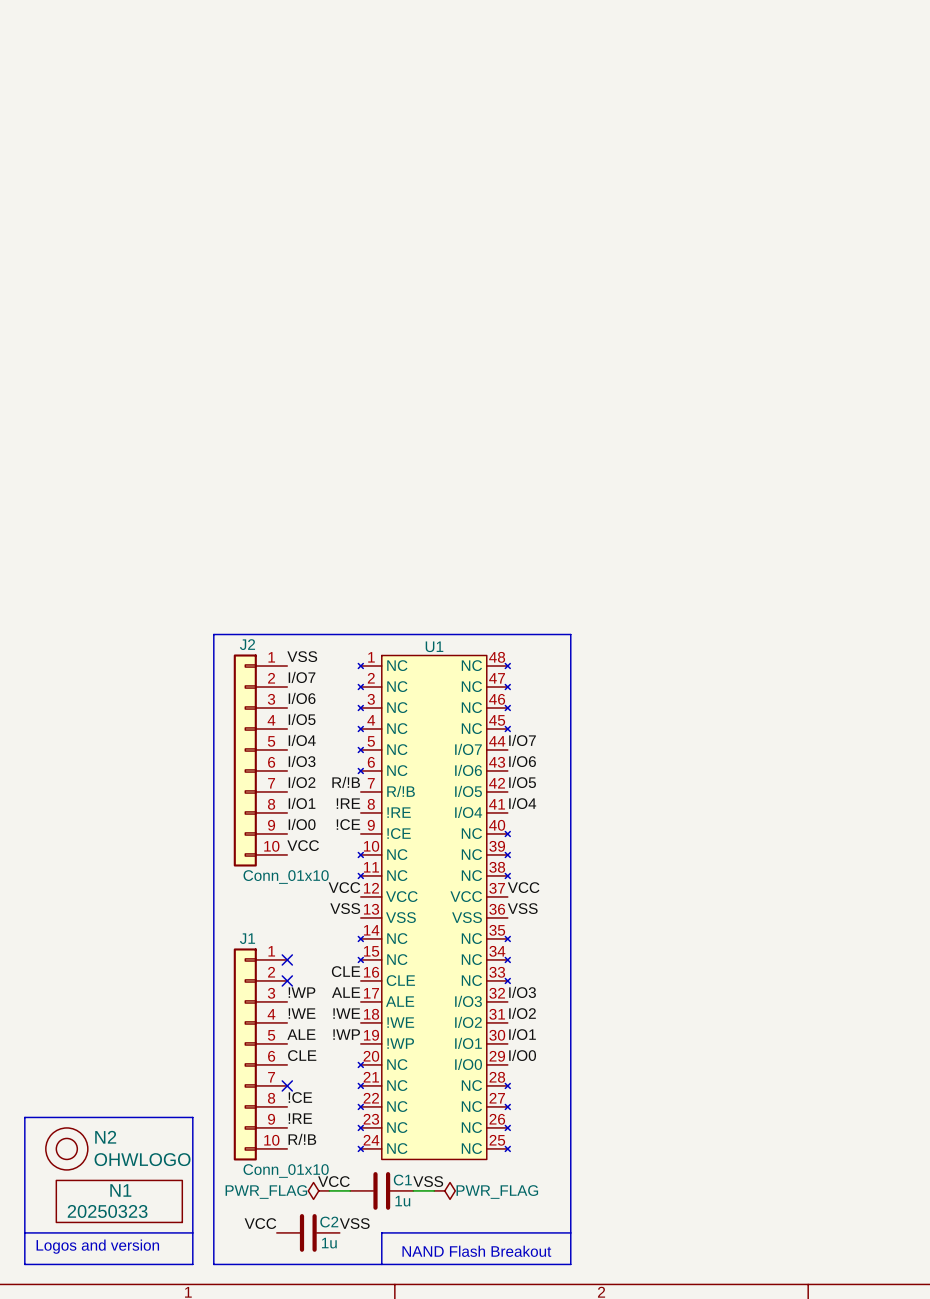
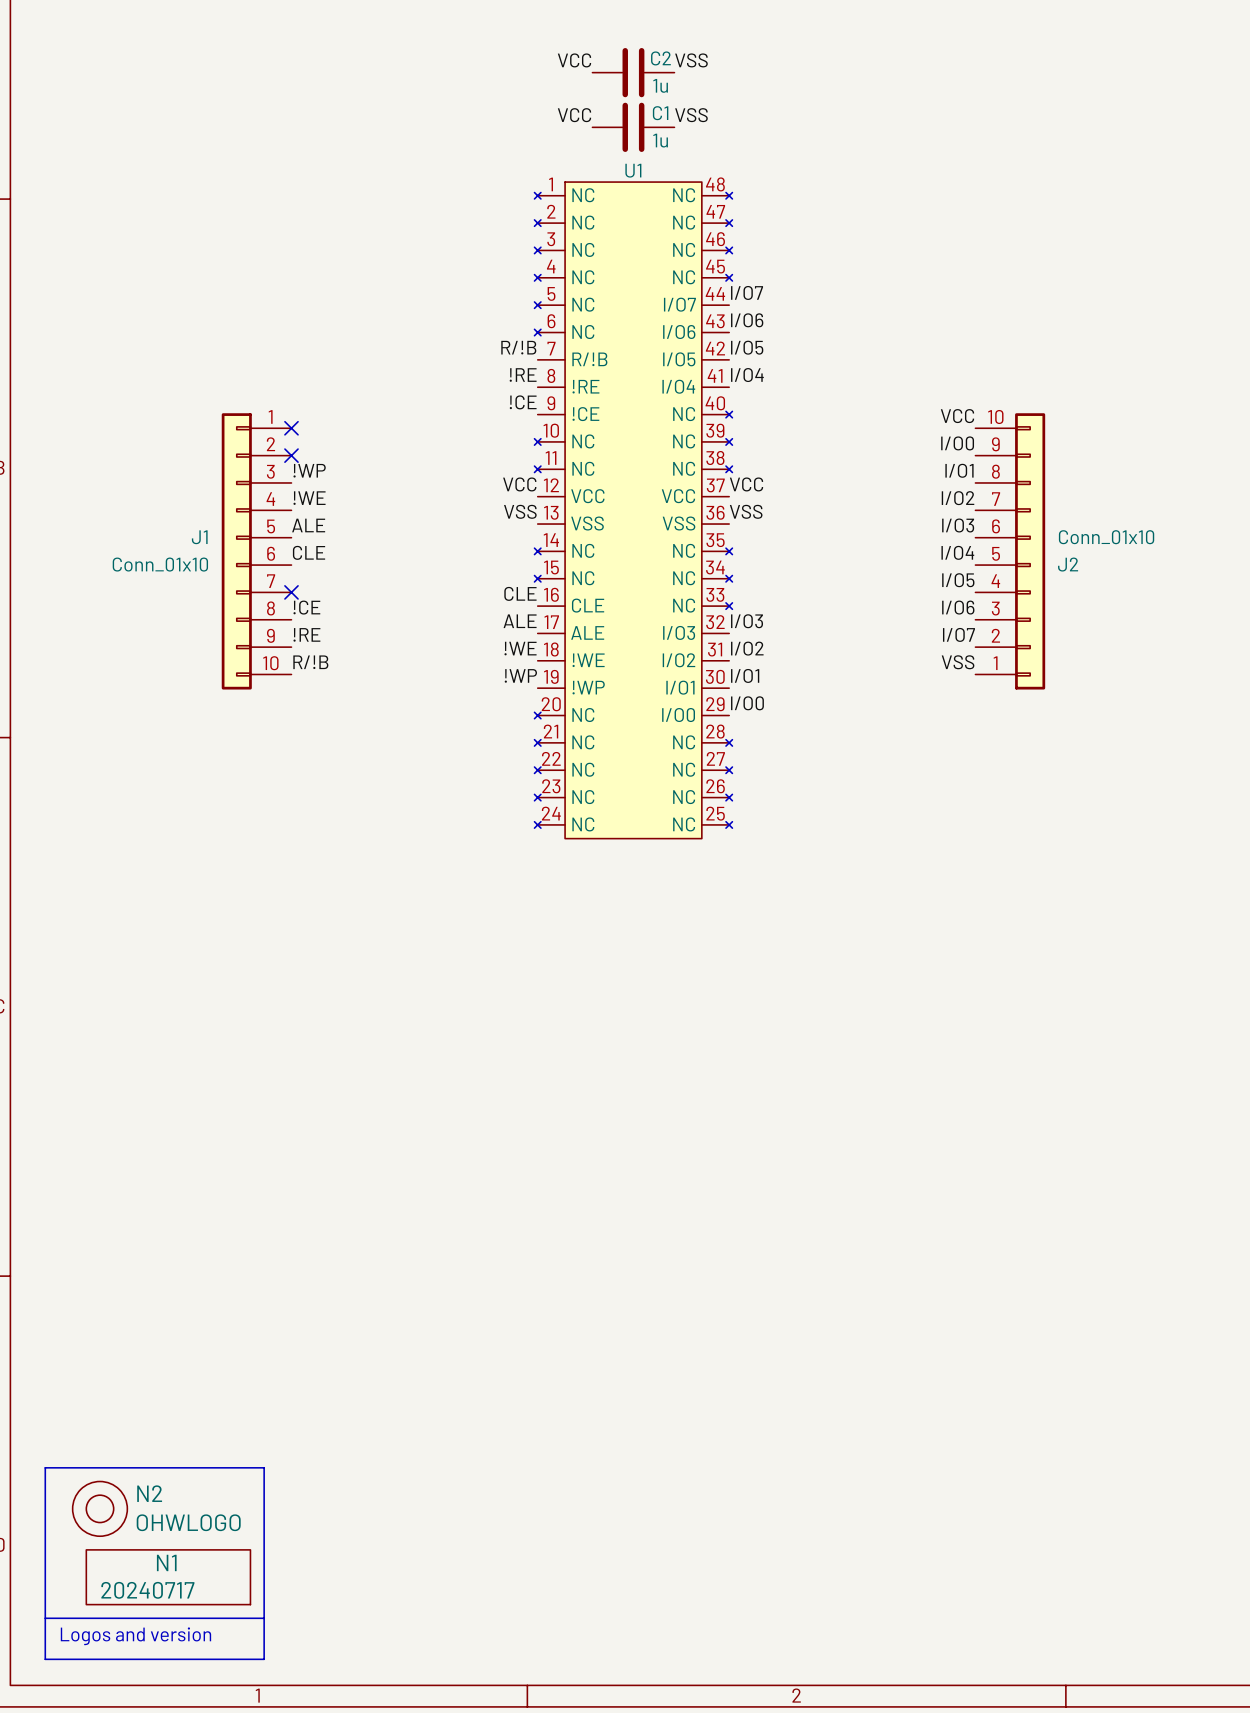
label: none -> VCC (574, 60)
label: none -> VSS (691, 60)
label: none -> VCC (574, 115)
label: none -> VSS (691, 115)
label: none -> I/O7 (747, 292)
label: none -> I/O6 (747, 320)
label: none -> R/!B (518, 347)
label: none -> I/O5 (747, 347)
label: none -> !RE (523, 375)
label: none -> I/O4 (747, 375)
label: none -> !CE (523, 402)
label: none -> VCC (957, 416)
no-connect mark: none -> (291, 428)
label: none -> I/O0 (957, 443)
no-connect mark: none -> (291, 455)
label: none -> I/O1 (959, 470)
label: none -> !WP (309, 470)
label: none -> VCC (519, 484)
label: none -> VCC (746, 484)
label: none -> I/O2 (958, 498)
label: none -> !WE (309, 498)
label: none -> VSS (520, 511)
label: none -> VSS (746, 511)
label: none -> I/O3 (958, 525)
label: none -> ALE (308, 525)
label: none -> I/O4 (957, 552)
label: none -> CLE (309, 552)
label: none -> I/O5 (958, 580)
no-connect mark: none -> (291, 592)
label: none -> CLE (520, 593)
label: none -> I/O6 (958, 607)
label: none -> !CE (306, 607)
label: none -> ALE (520, 621)
label: none -> I/O3 (747, 621)
label: none -> I/O7 (958, 634)
label: none -> !RE (306, 634)
label: none -> !WE (520, 648)
label: none -> I/O2 (747, 648)
label: none -> R/!B (310, 662)
label: none -> VSS (958, 662)
label: none -> !WP (520, 675)
label: none -> I/O1 (745, 675)
label: none -> I/O0 (747, 703)
line: (213, 634) (213, 1264) (570, 1264) (570, 634) (213, 634) -> none
J2 name position: J2 (247, 644) -> J2 (1068, 564)
label: VSS (302, 656) -> none
label: I/O7 (302, 677) -> none
label: I/O6 (302, 698) -> none
label: I/O5 (302, 719) -> none
label: I/O4 (302, 740) -> none
label: I/O7 (522, 740) -> none
J2 rotation: 0° (245, 760) -> 180° (1030, 551)
J2 position: (260, 760) -> (1010, 551)
label: I/O3 (302, 761) -> none
label: I/O6 (522, 761) -> none
label: I/O2 (302, 782) -> none
label: R/!B (346, 782) -> none
label: I/O5 (522, 782) -> none
label: I/O1 (302, 803) -> none
label: !RE (348, 803) -> none
label: I/O4 (522, 803) -> none
label: I/O0 (302, 824) -> none
label: !CE (348, 824) -> none
label: VCC (303, 845) -> none
J2 value position: Conn_01x10 (286, 877) -> Conn_01x10 (1106, 537)
label: VCC (344, 887) -> none
label: VCC (523, 887) -> none
U1 position: (434, 907) -> (633, 510)
label: VSS (345, 908) -> none
label: VSS (522, 908) -> none
J1 name position: J1 (247, 938) -> J1 (199, 537)
no-connect mark: (287, 959) -> none
label: CLE (346, 971) -> none
no-connect mark: (287, 980) -> none
label: !WP (301, 992) -> none
label: ALE (346, 992) -> none
label: I/O3 (522, 992) -> none
label: !WE (302, 1013) -> none
label: !WE (346, 1013) -> none
label: I/O2 (522, 1013) -> none
label: ALE (301, 1034) -> none
label: !WP (346, 1034) -> none
label: I/O1 (522, 1034) -> none
J1 position: (260, 1054) -> (256, 551)
label: CLE (302, 1055) -> none
label: I/O0 (522, 1055) -> none
no-connect mark: (287, 1085) -> none
label: !CE (300, 1097) -> none
label: !RE (300, 1118) -> none
label: R/!B (302, 1139) -> none
J1 value position: Conn_01x10 (286, 1170) -> Conn_01x10 (160, 564)
label: VCC (333, 1181) -> none
label: VSS (428, 1181) -> none
power symbol: PWR_FLAG (318, 1190) -> none
wire: (329, 1190) (350, 1190) -> none
C1 position: (381, 1190) -> (633, 127)
wire: (413, 1190) (434, 1190) -> none
power symbol: PWR_FLAG (444, 1190) -> none
N1 value: 20250323 (107, 1211) -> 20240717 (147, 1590)
label: VCC (260, 1223) -> none
label: VSS (354, 1223) -> none
C2 position: (308, 1232) -> (633, 72)
line: (570, 1232) (381, 1232) (381, 1264) -> none
text: NAND Flash Breakout (476, 1251) -> none

